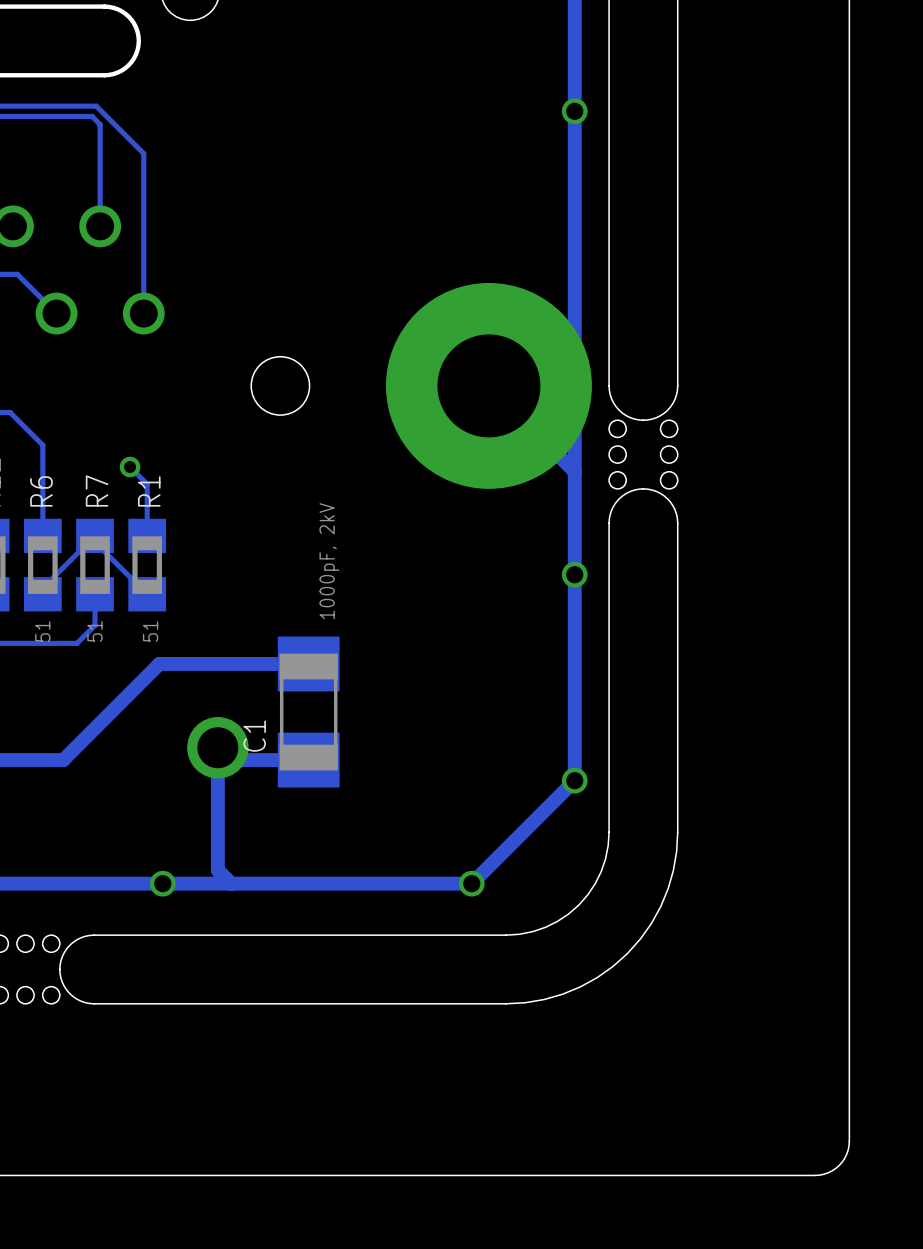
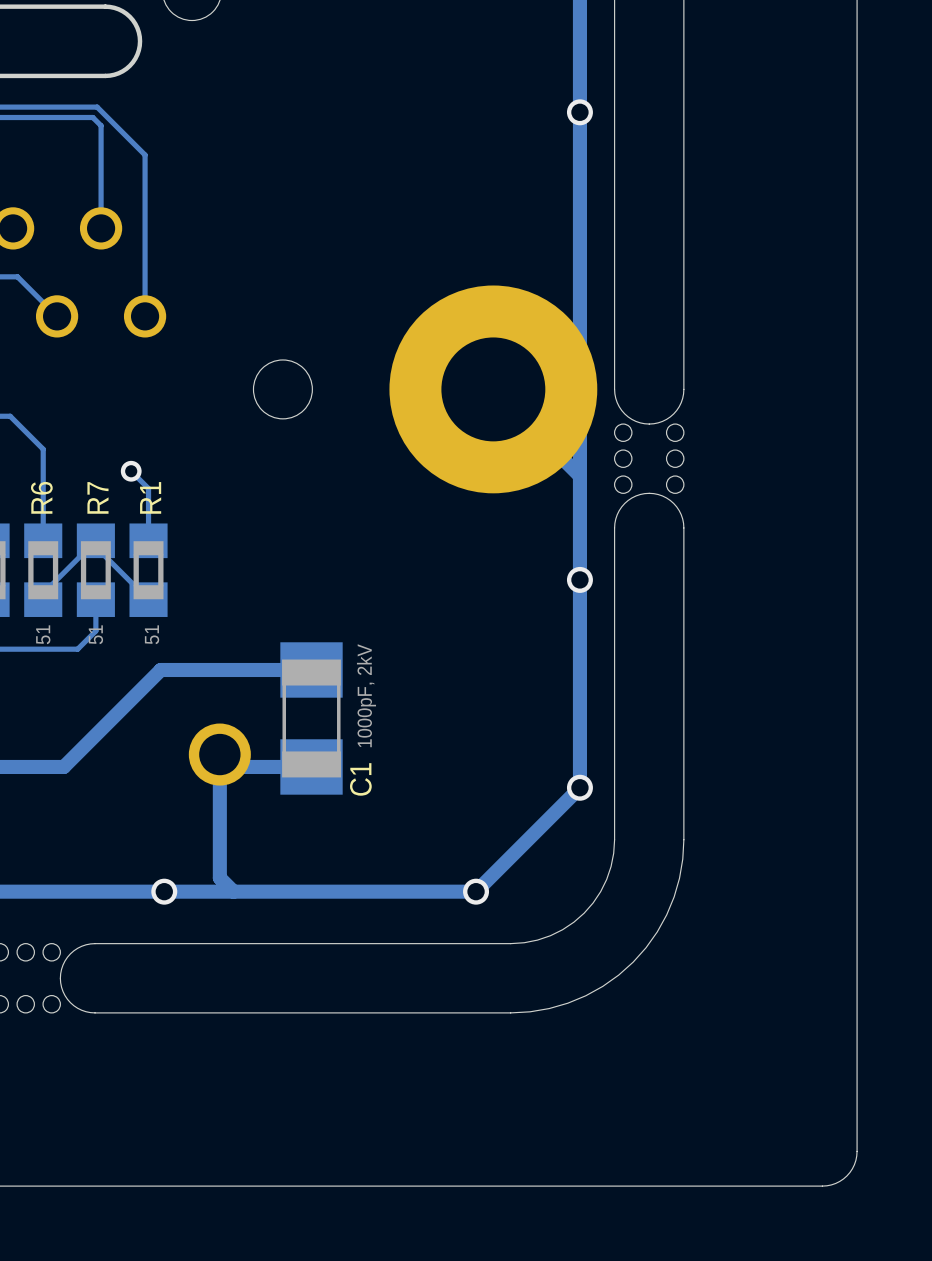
C1 value position: 1000pF, 2kV (329, 561) -> 1000pF, 2kV (366, 695)
C1 name position: C1 (254, 736) -> C1 (360, 779)

